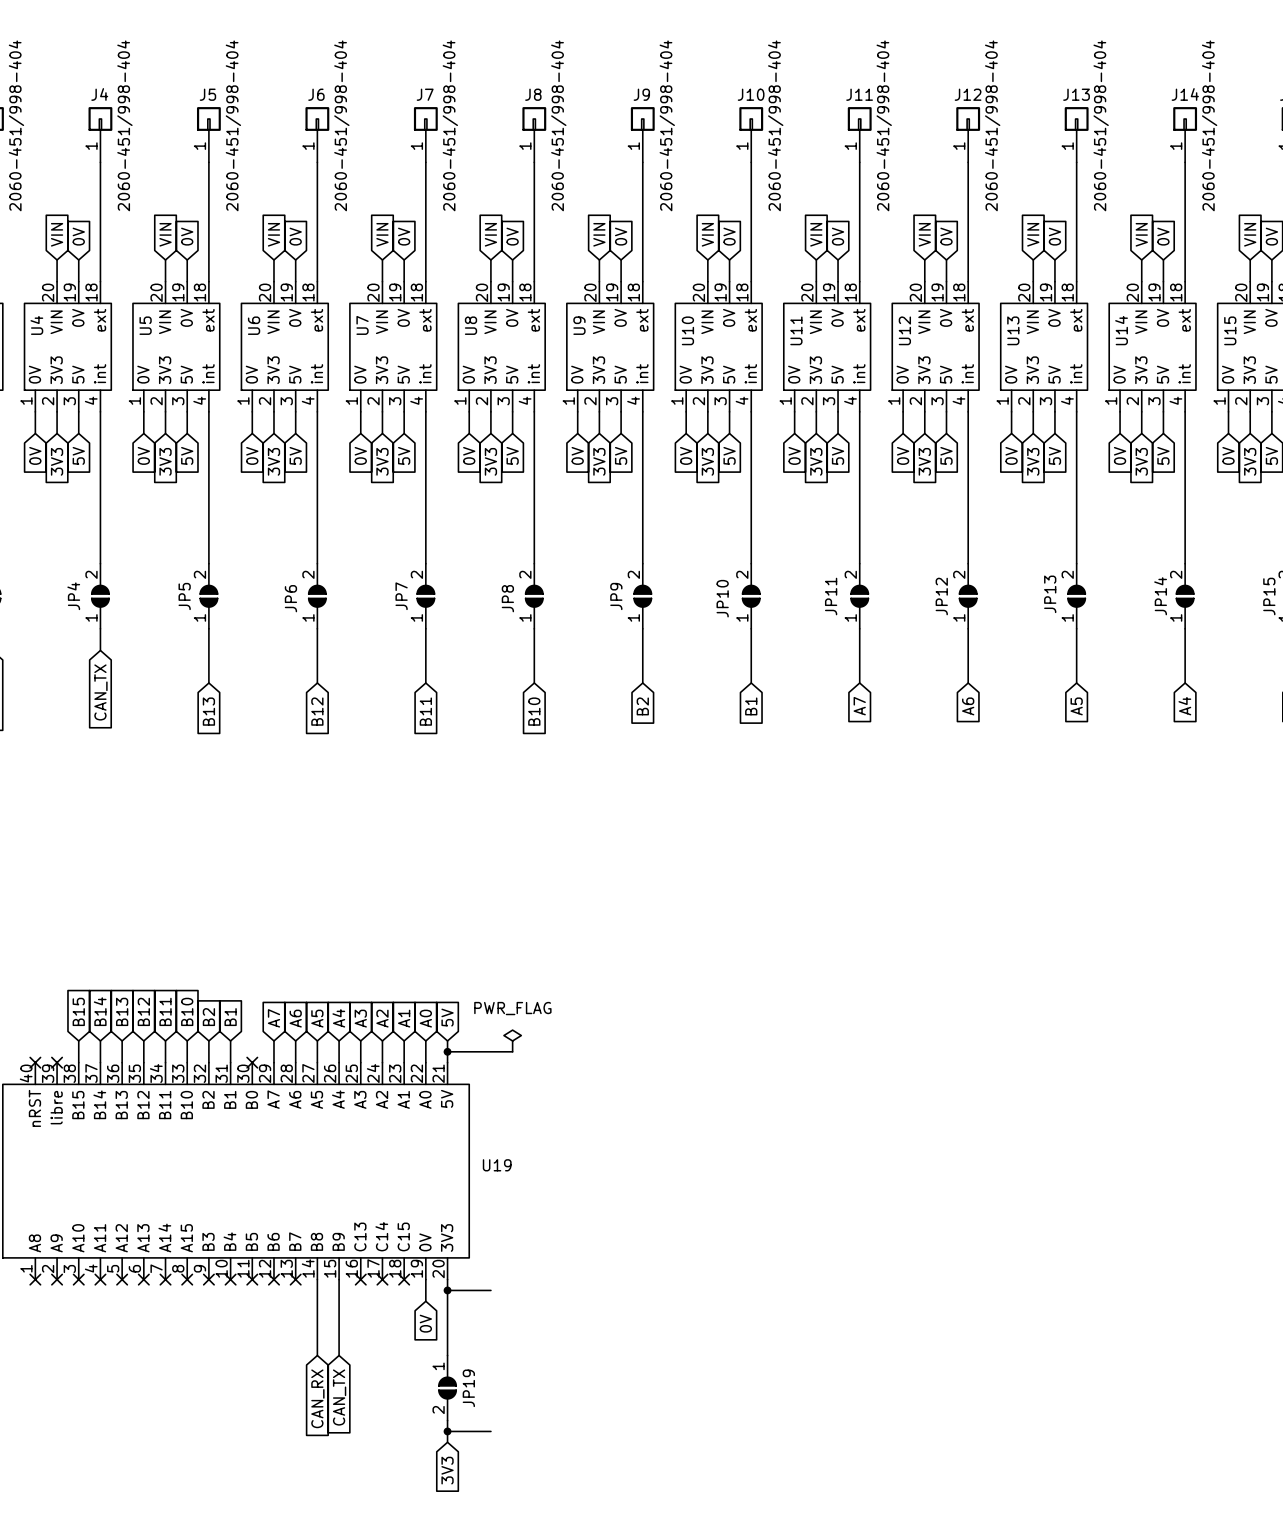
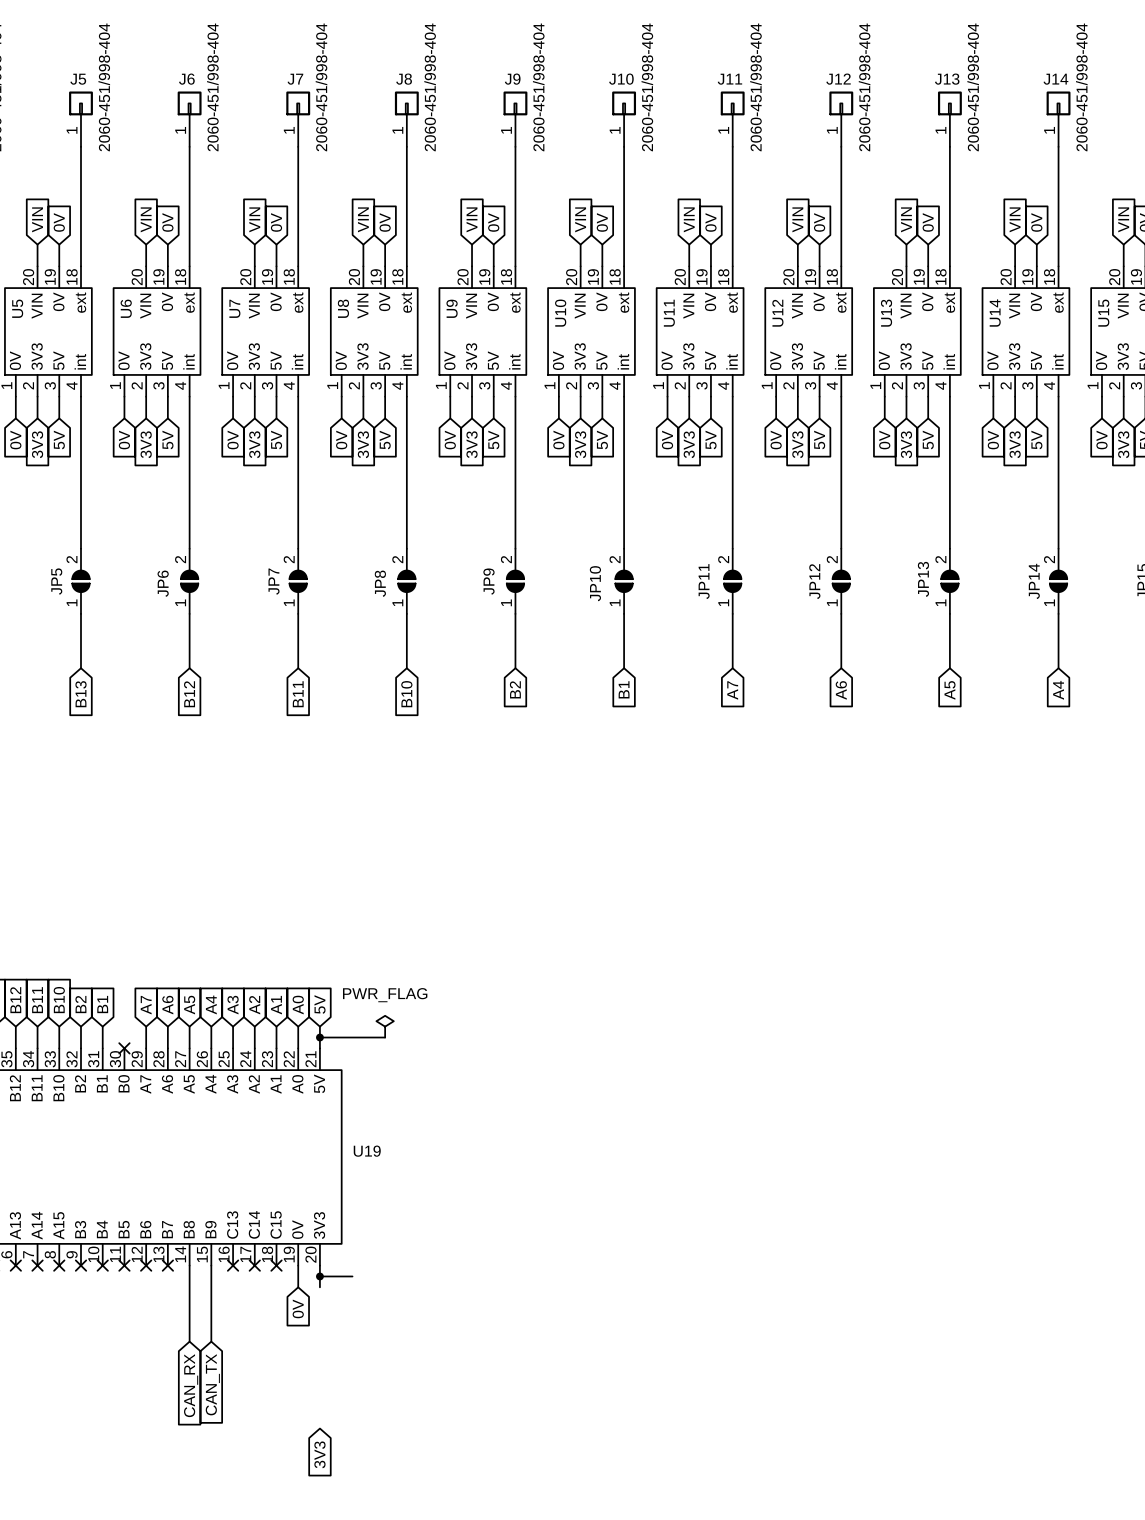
wire: (480, 1290) (490, 1290) -> none
wire: (447, 1301) (447, 1355) -> none
JP19: (447, 1388) -> none
wire: (447, 1420) (447, 1442) -> none
wire: (447, 1431) (490, 1431) -> none
junction: (447, 1431) -> none

